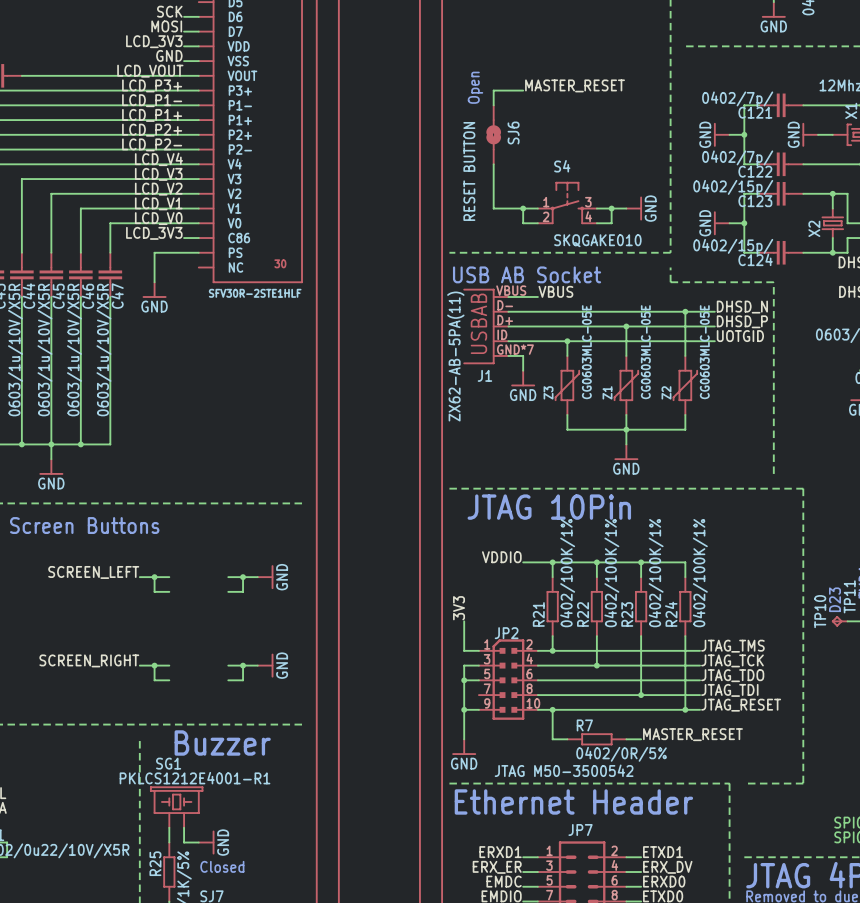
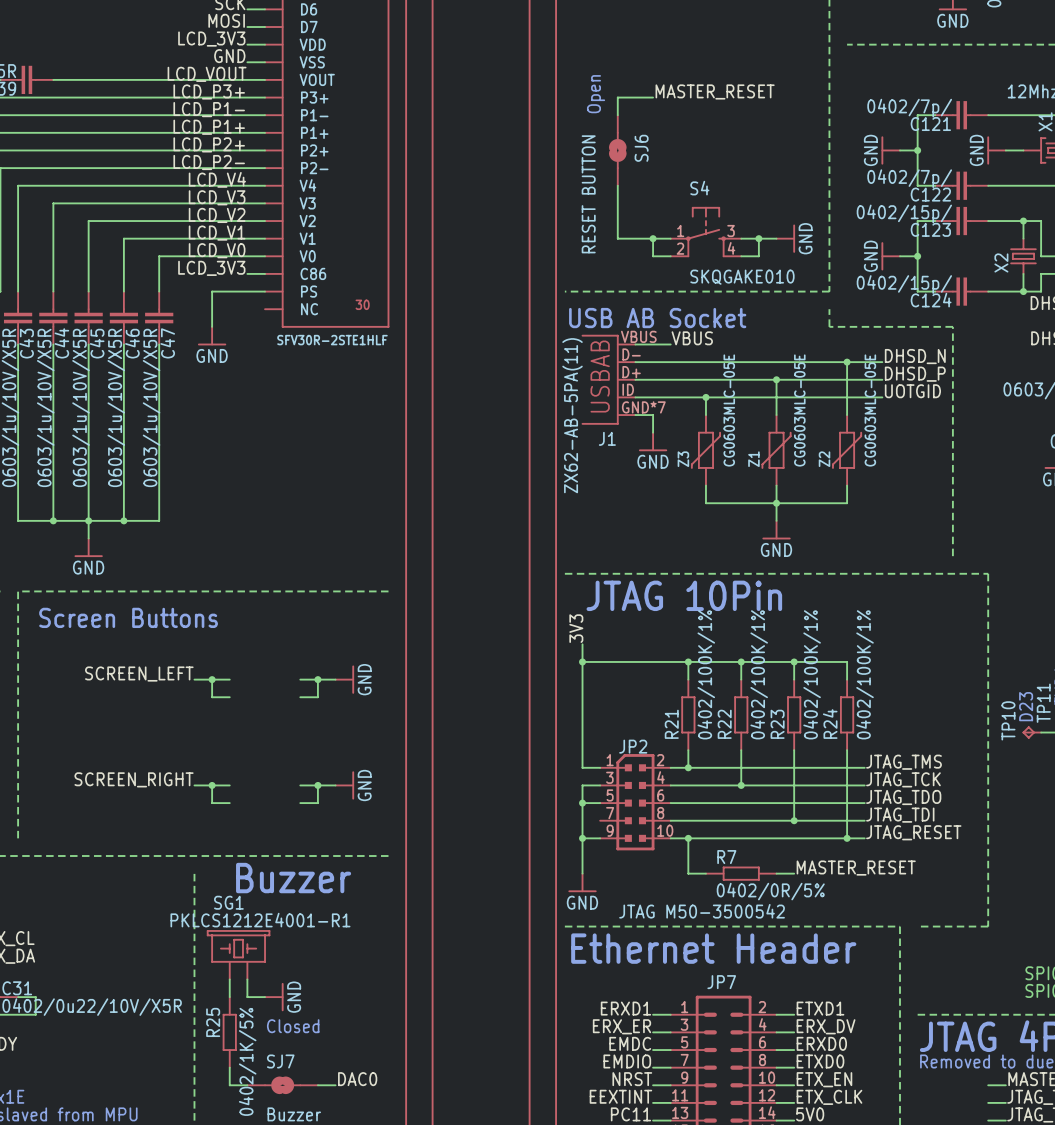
wire: none -> (582, 644) (582, 732)
label: VDDIO (501, 557) -> none
wire: none -> (582, 661) (653, 661)
junction: none -> (582, 661)
label position: 3V3 (459, 608) -> 3V3 (576, 628)

